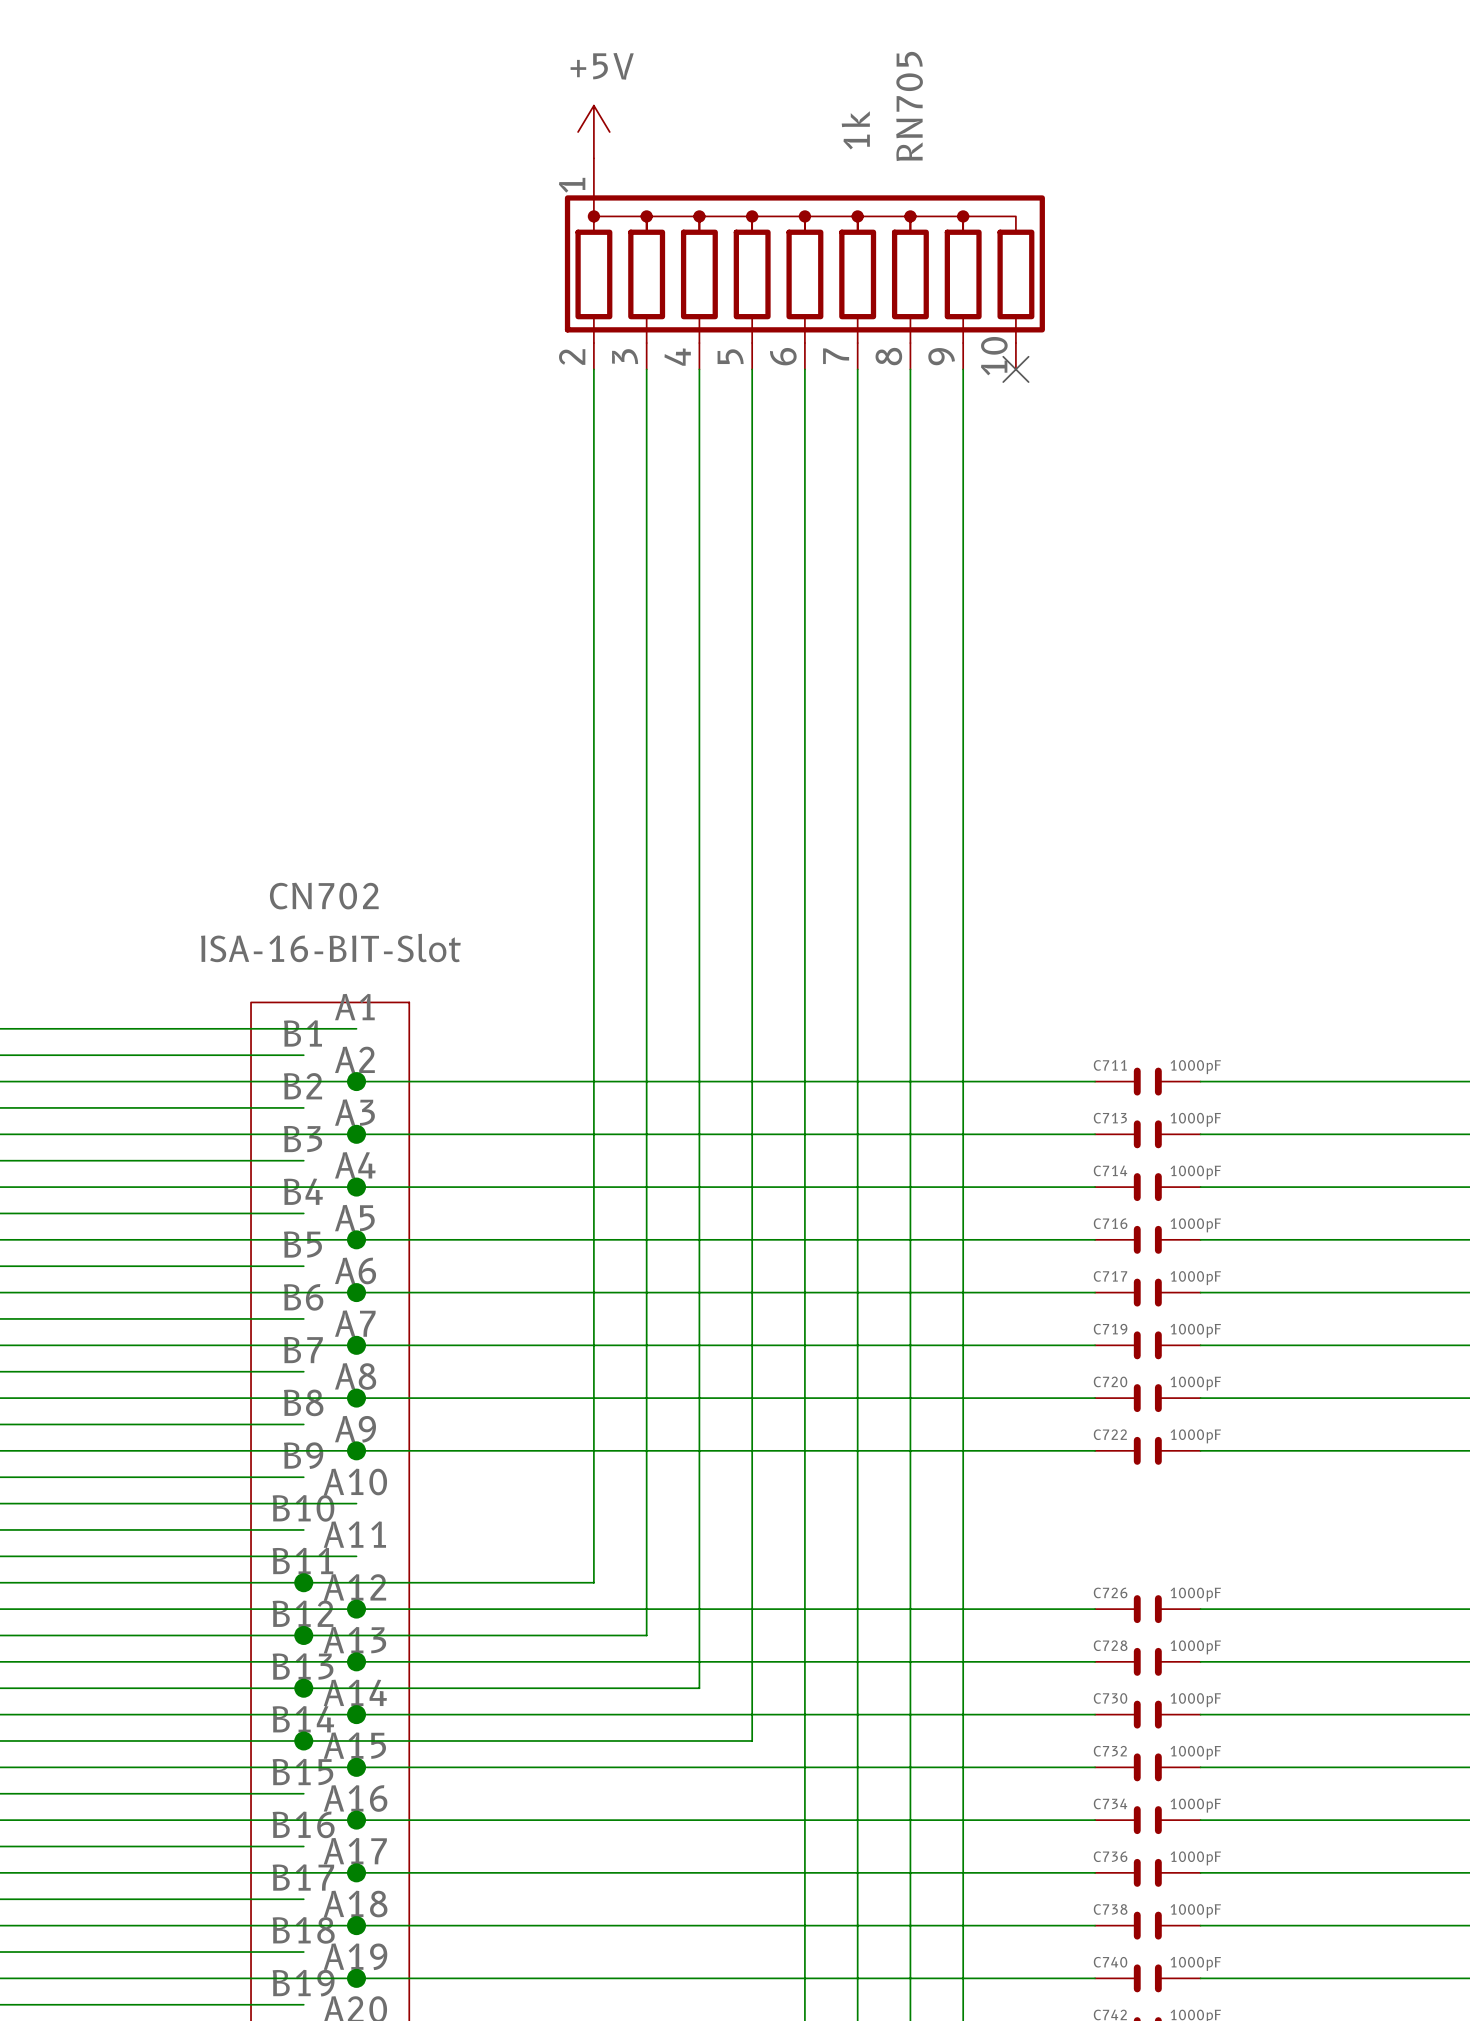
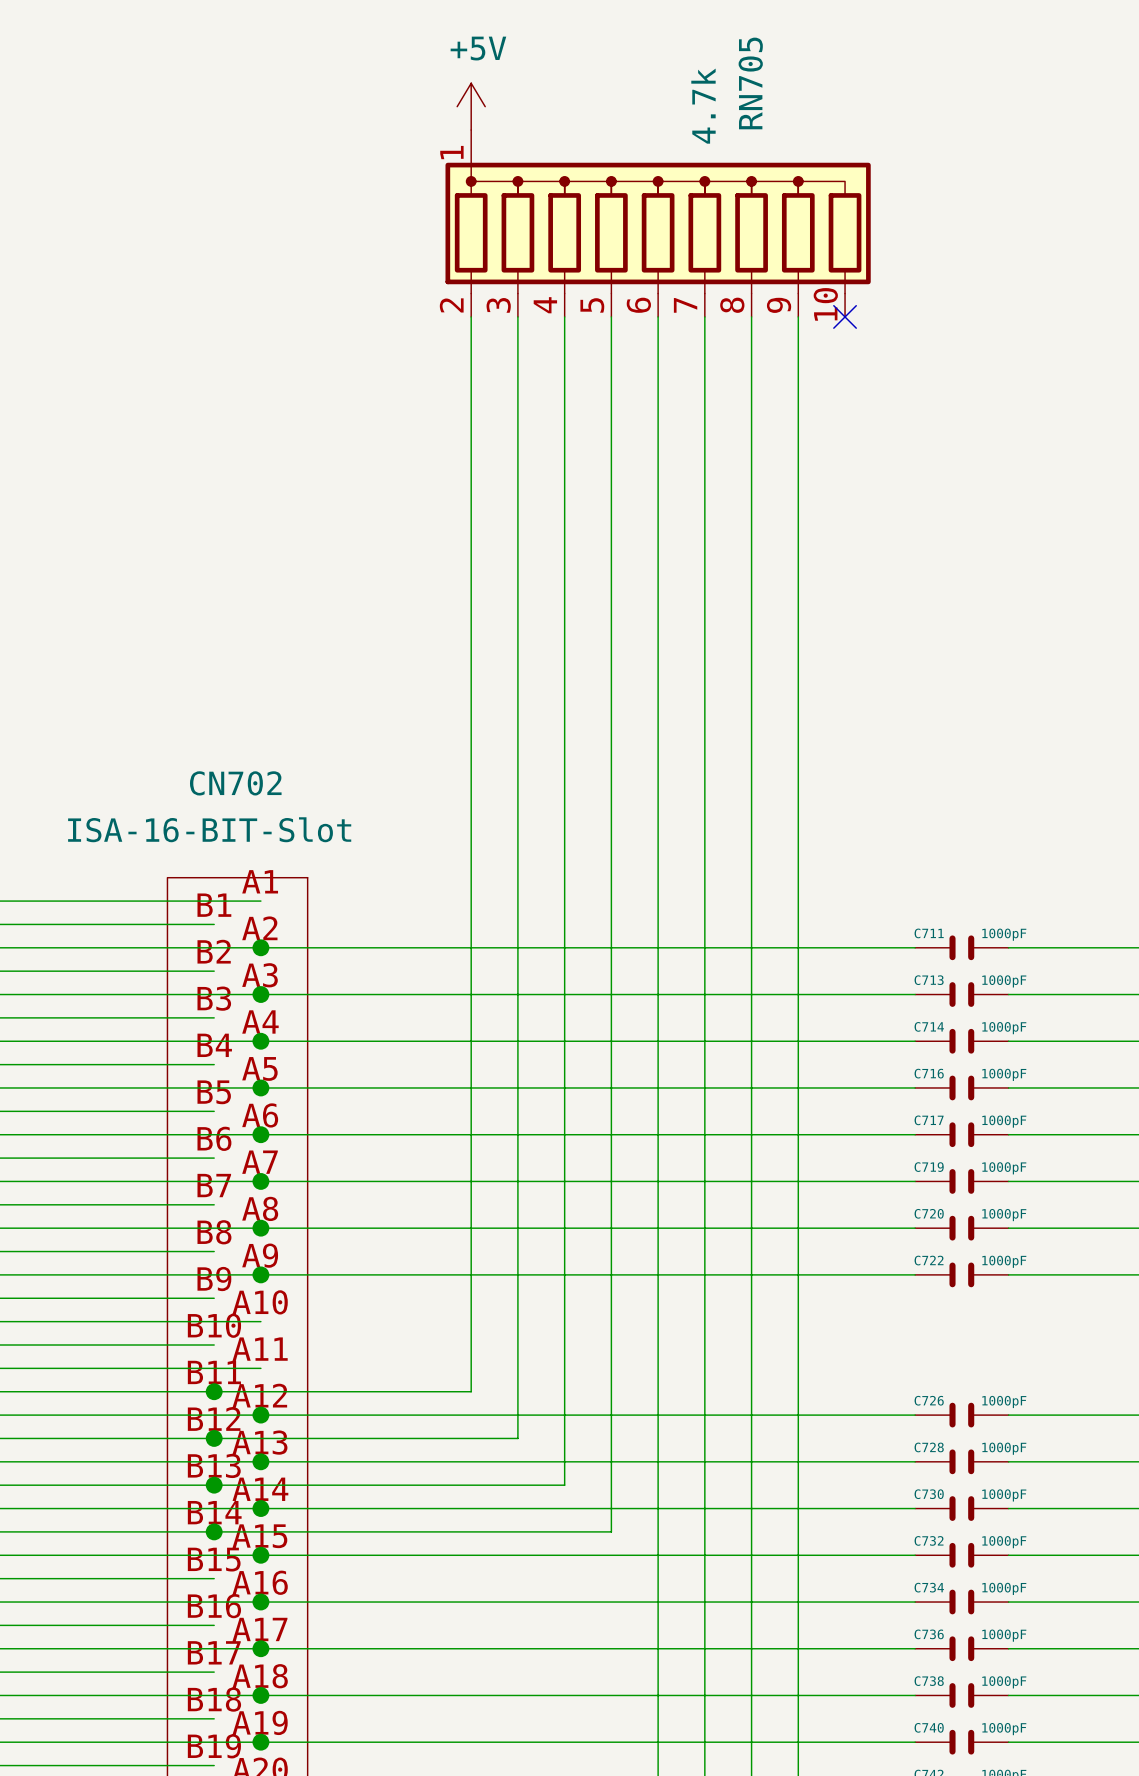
RN705 value: 1k (855, 130) -> 4.7k (703, 106)

